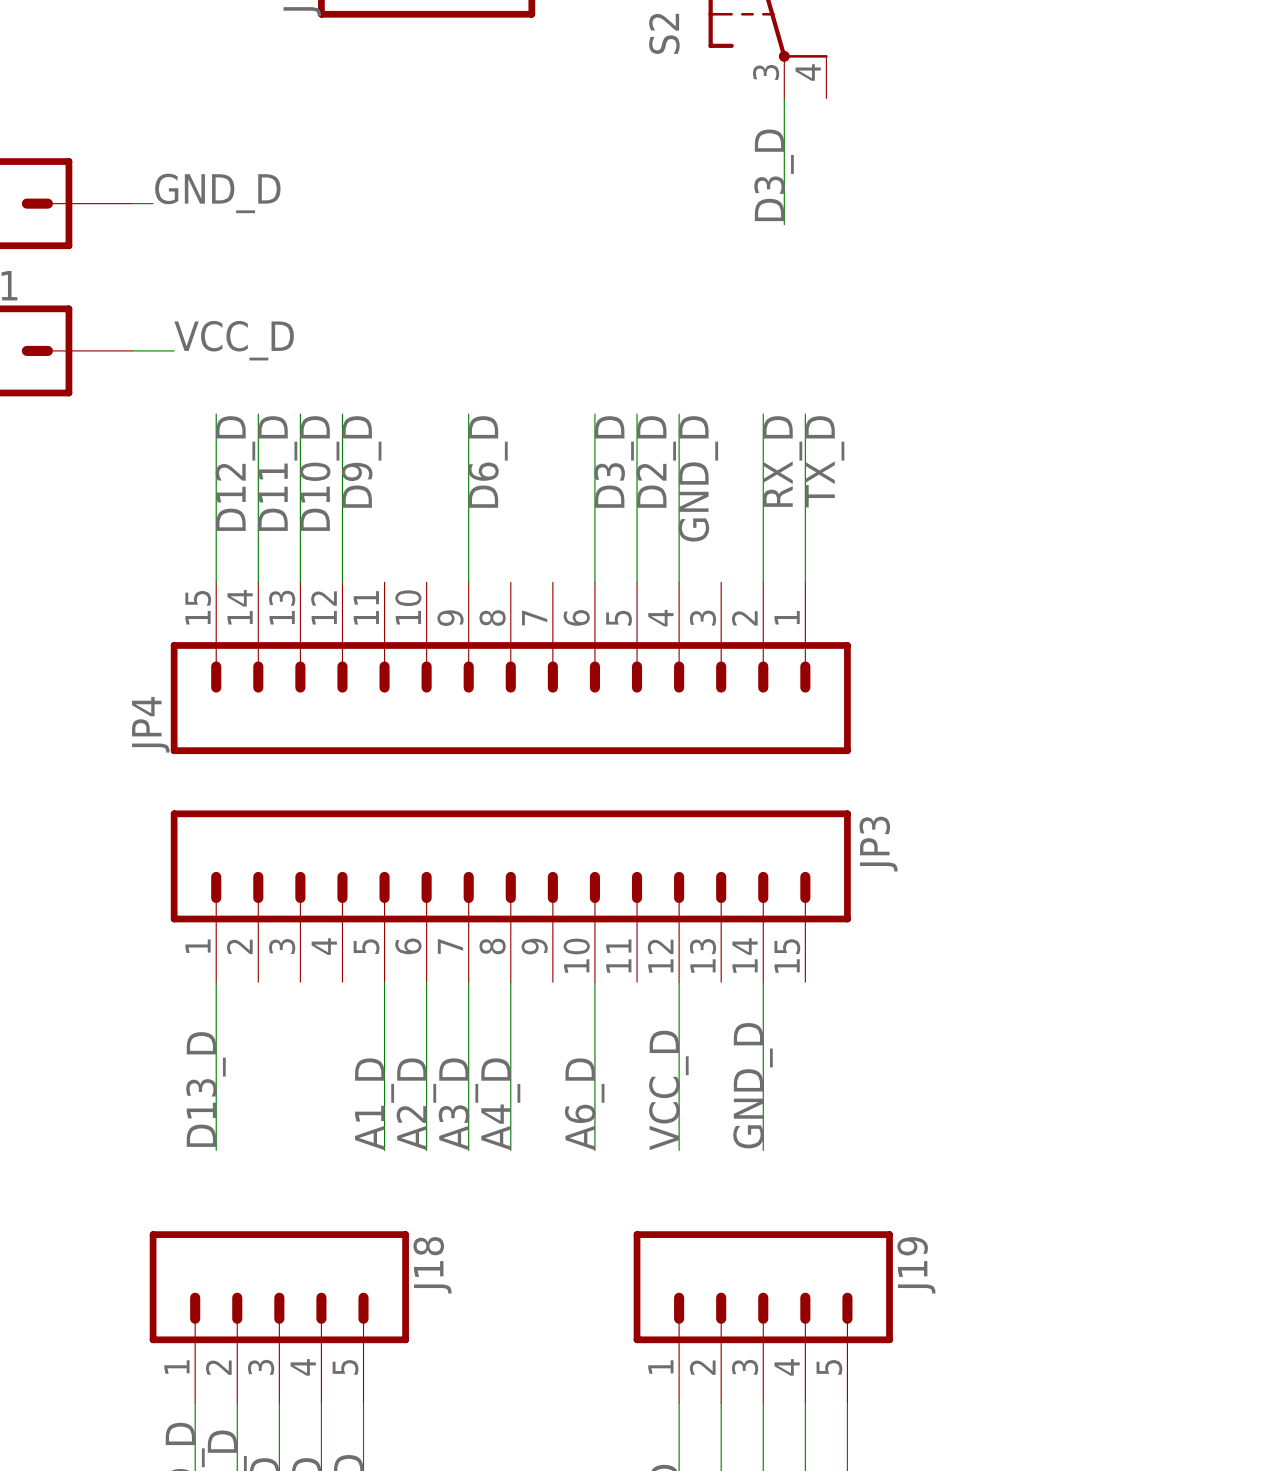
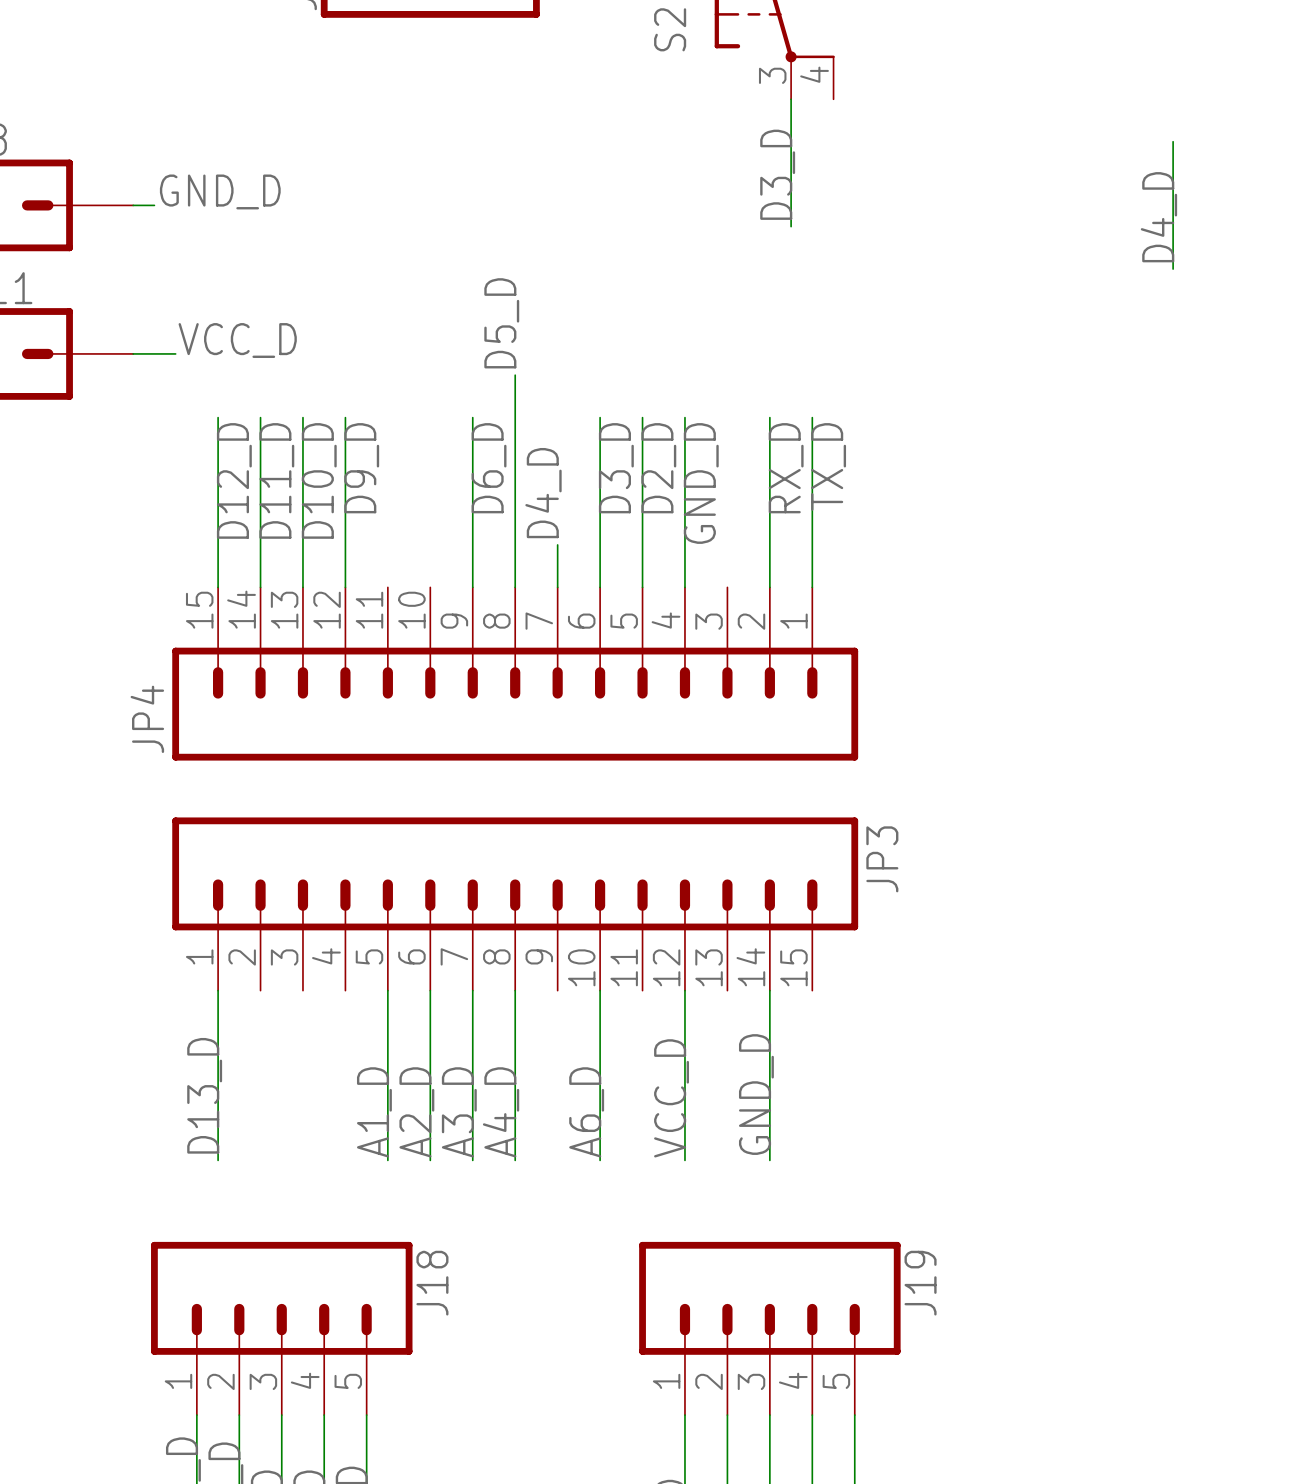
wire: none -> (1173, 141) (1173, 269)
label: none -> D4_D (1158, 217)
label: none -> D5_D (501, 323)
wire: none -> (515, 375) (515, 587)
label: none -> D4_D (543, 493)
wire: none -> (557, 544) (557, 587)

